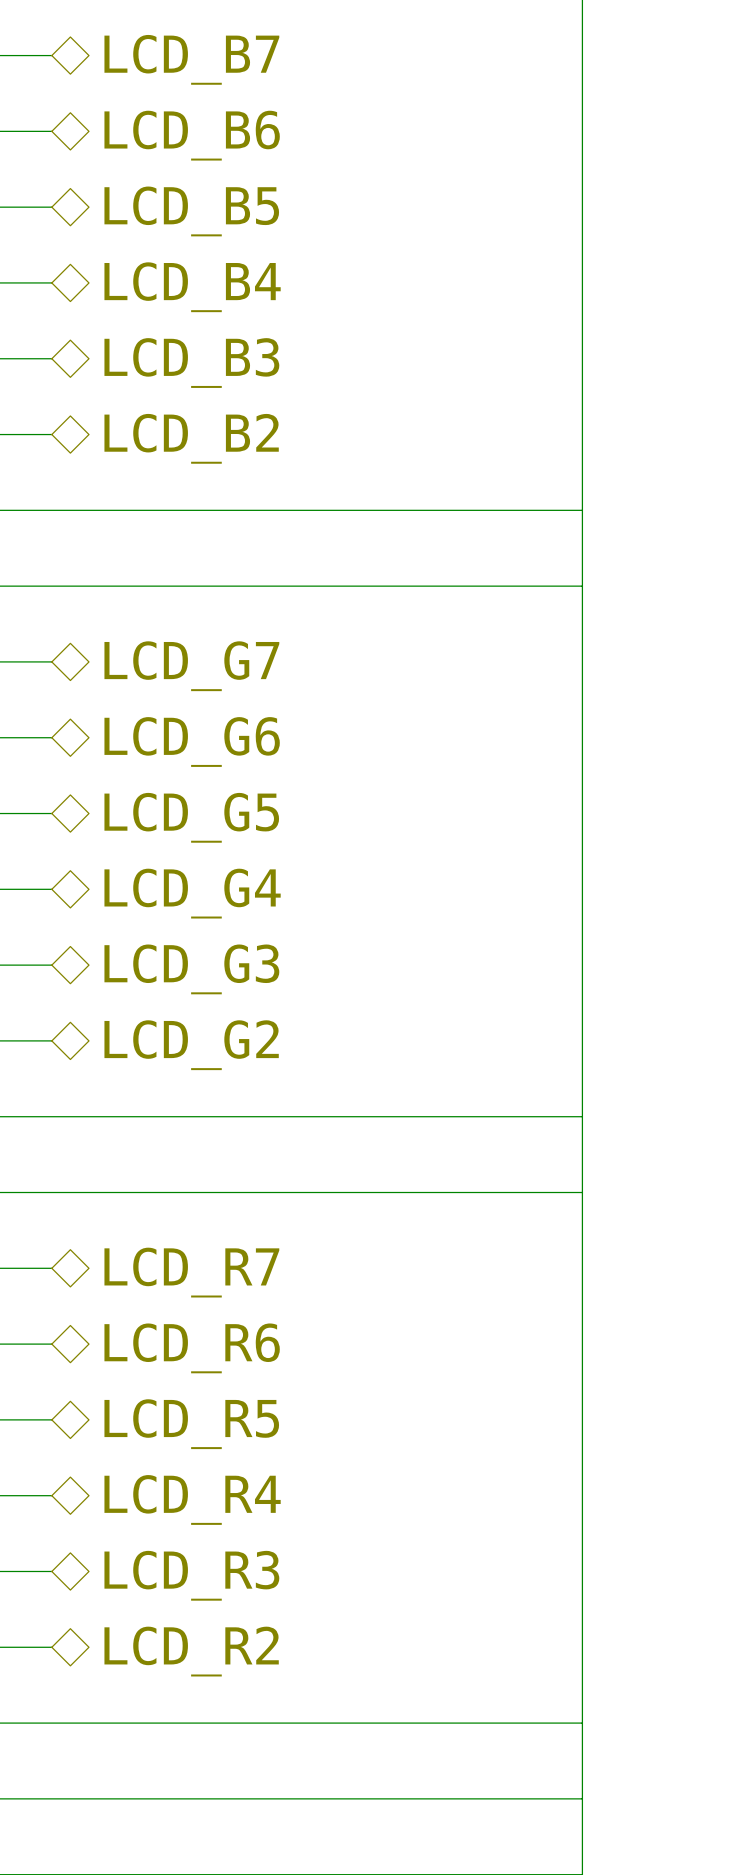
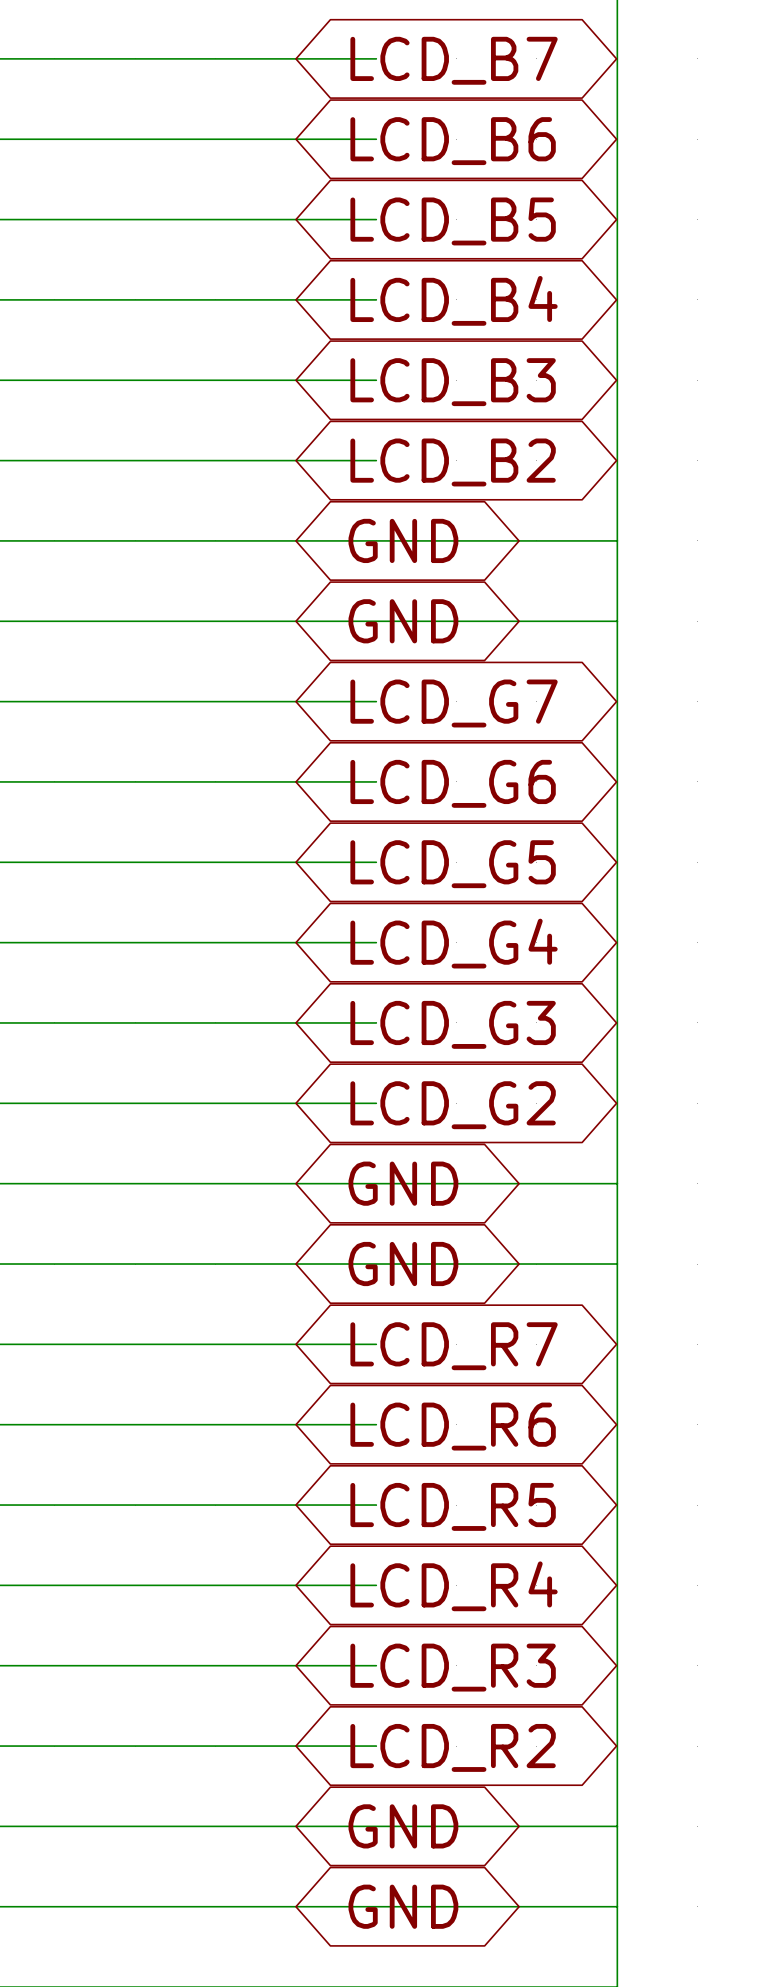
wire: none -> (54, 58) (376, 58)
hierarchical label: LCD_B7 (191, 59) -> none
global label: none -> LCD_B7 (454, 60)
wire: none -> (54, 139) (376, 139)
hierarchical label: LCD_B6 (192, 135) -> none
global label: none -> LCD_B6 (453, 141)
wire: none -> (54, 219) (376, 219)
hierarchical label: LCD_B5 (191, 211) -> none
global label: none -> LCD_B5 (453, 221)
wire: none -> (54, 299) (376, 299)
hierarchical label: LCD_B4 (192, 287) -> none
global label: none -> LCD_B4 (454, 300)
wire: none -> (54, 380) (376, 380)
hierarchical label: LCD_B3 (191, 363) -> none
global label: none -> LCD_B3 (453, 382)
wire: none -> (54, 460) (376, 460)
hierarchical label: LCD_B2 (191, 438) -> none
global label: none -> LCD_B2 (453, 462)
global label: none -> GND (403, 540)
global label: none -> GND (403, 621)
wire: none -> (54, 701) (376, 701)
hierarchical label: LCD_G7 (191, 666) -> none
global label: none -> LCD_G7 (454, 703)
wire: none -> (54, 781) (376, 781)
hierarchical label: LCD_G6 (192, 742) -> none
global label: none -> LCD_G6 (453, 783)
wire: none -> (54, 862) (376, 862)
hierarchical label: LCD_G5 (191, 817) -> none
global label: none -> LCD_G5 (453, 864)
wire: none -> (54, 942) (376, 942)
hierarchical label: LCD_G4 (192, 893) -> none
global label: none -> LCD_G4 (454, 943)
wire: none -> (54, 1022) (376, 1022)
hierarchical label: LCD_G3 (191, 969) -> none
global label: none -> LCD_G3 (453, 1024)
wire: none -> (54, 1103) (376, 1103)
hierarchical label: LCD_G2 (191, 1045) -> none
global label: none -> LCD_G2 (453, 1105)
global label: none -> GND (403, 1183)
global label: none -> GND (403, 1264)
wire: none -> (54, 1344) (376, 1344)
hierarchical label: LCD_R7 (191, 1272) -> none
global label: none -> LCD_R7 (454, 1346)
wire: none -> (54, 1424) (376, 1424)
hierarchical label: LCD_R6 (192, 1348) -> none
global label: none -> LCD_R6 (453, 1426)
wire: none -> (54, 1505) (376, 1505)
hierarchical label: LCD_R5 (191, 1424) -> none
global label: none -> LCD_R5 (453, 1506)
wire: none -> (54, 1585) (376, 1585)
hierarchical label: LCD_R4 (192, 1499) -> none
global label: none -> LCD_R4 (454, 1586)
wire: none -> (54, 1665) (376, 1665)
hierarchical label: LCD_R3 (191, 1575) -> none
global label: none -> LCD_R3 (453, 1667)
wire: none -> (54, 1746) (376, 1746)
hierarchical label: LCD_R2 (191, 1651) -> none
global label: none -> LCD_R2 (453, 1747)
global label: none -> GND (403, 1826)
global label: none -> GND (403, 1906)

